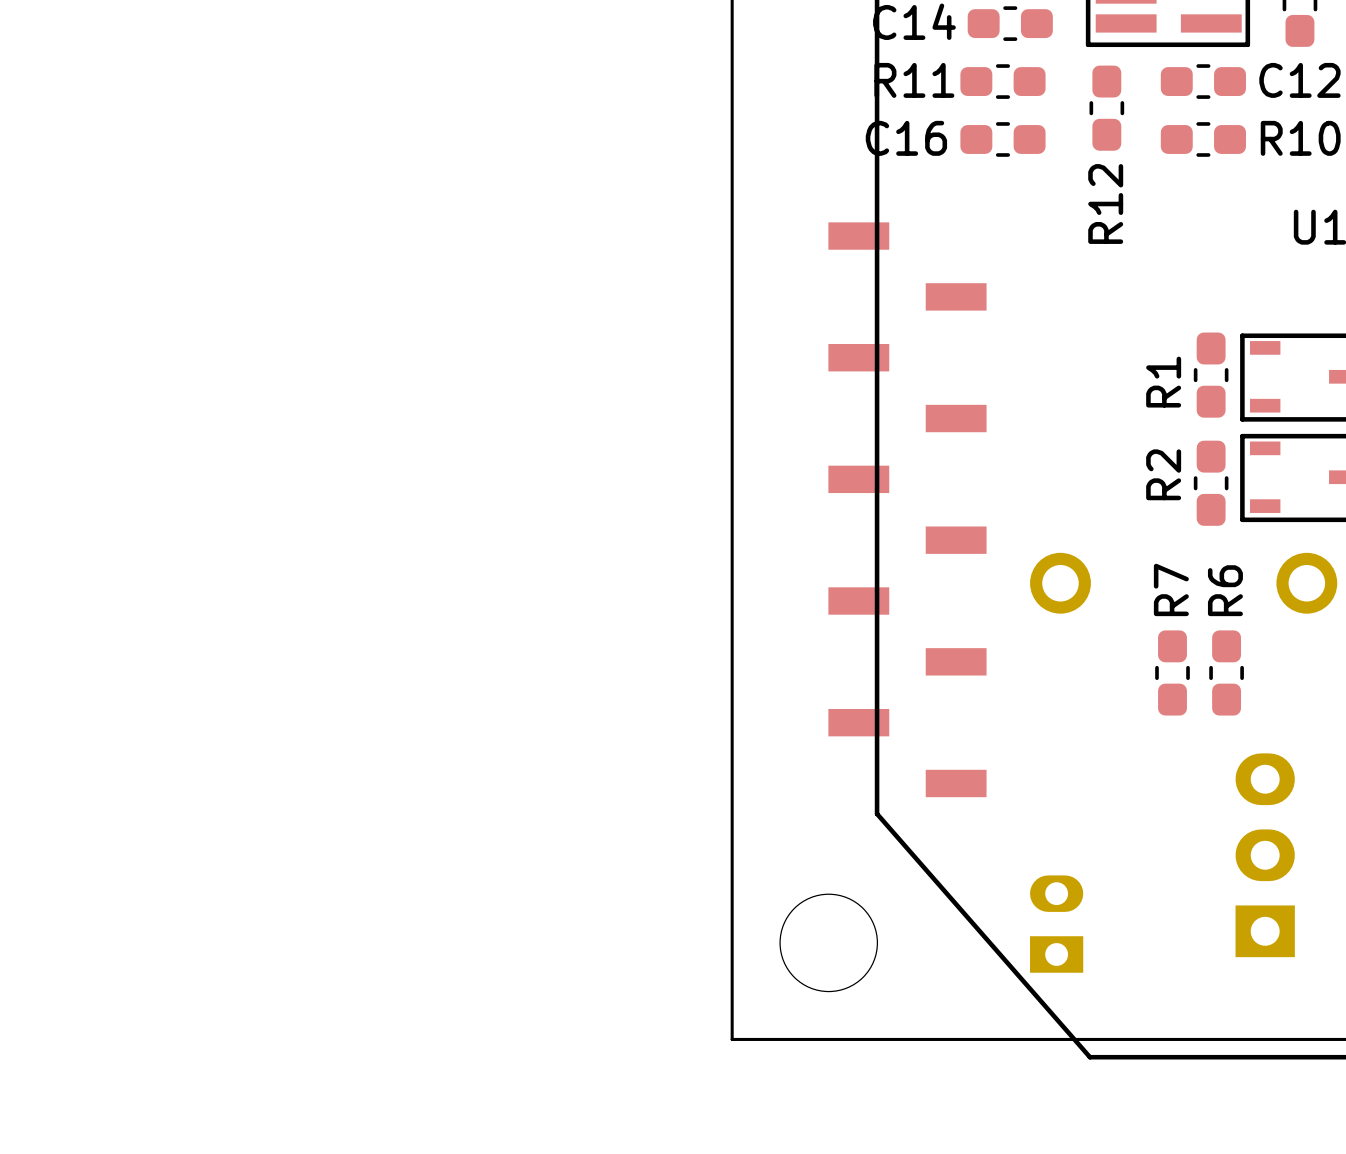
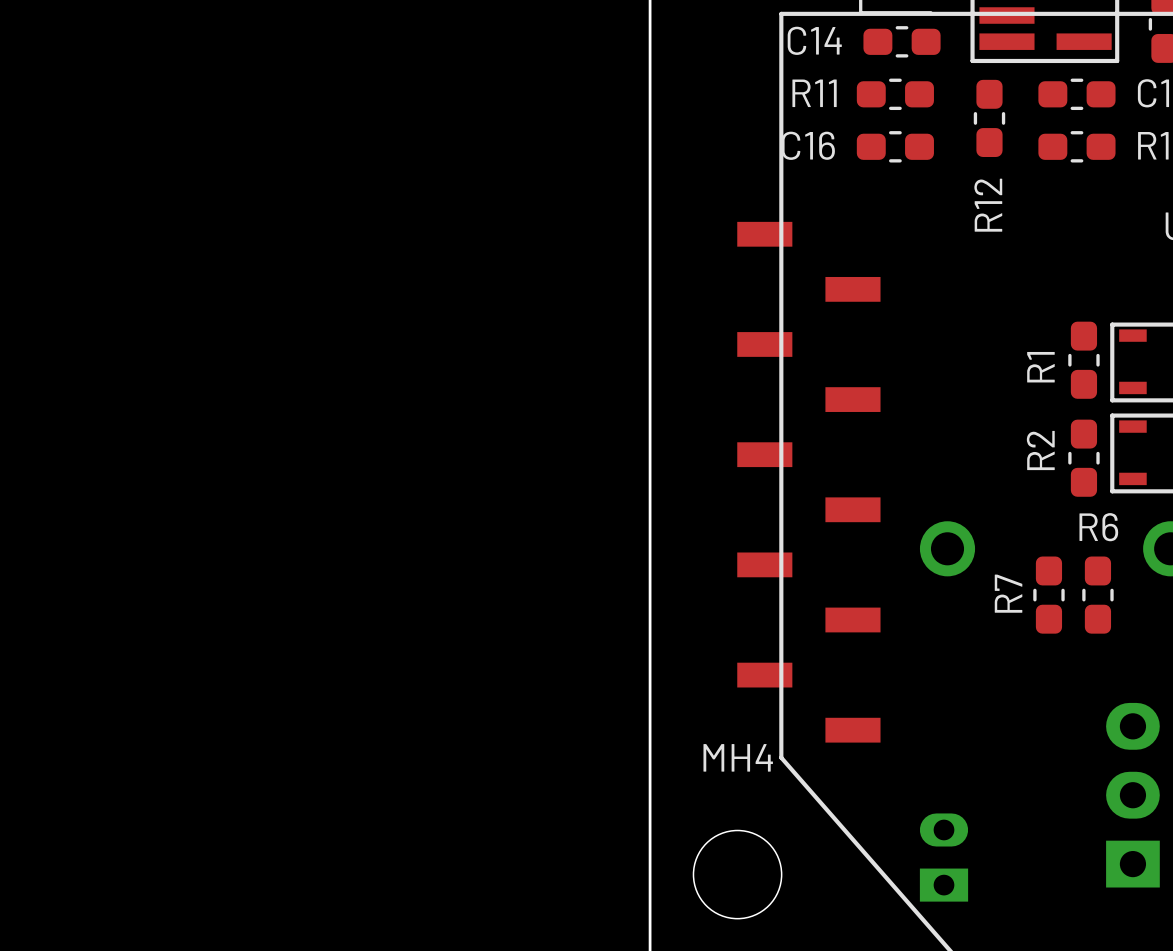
R7 name position: R7 (1171, 589) -> R7 (1008, 593)
R6 name rotation: 0° (1225, 590) -> 90° clockwise (1098, 527)
R7 position: (1172, 672) -> (1048, 595)
R6 position: (1226, 672) -> (1097, 595)
MH4 name: none -> MH4 (738, 757)

